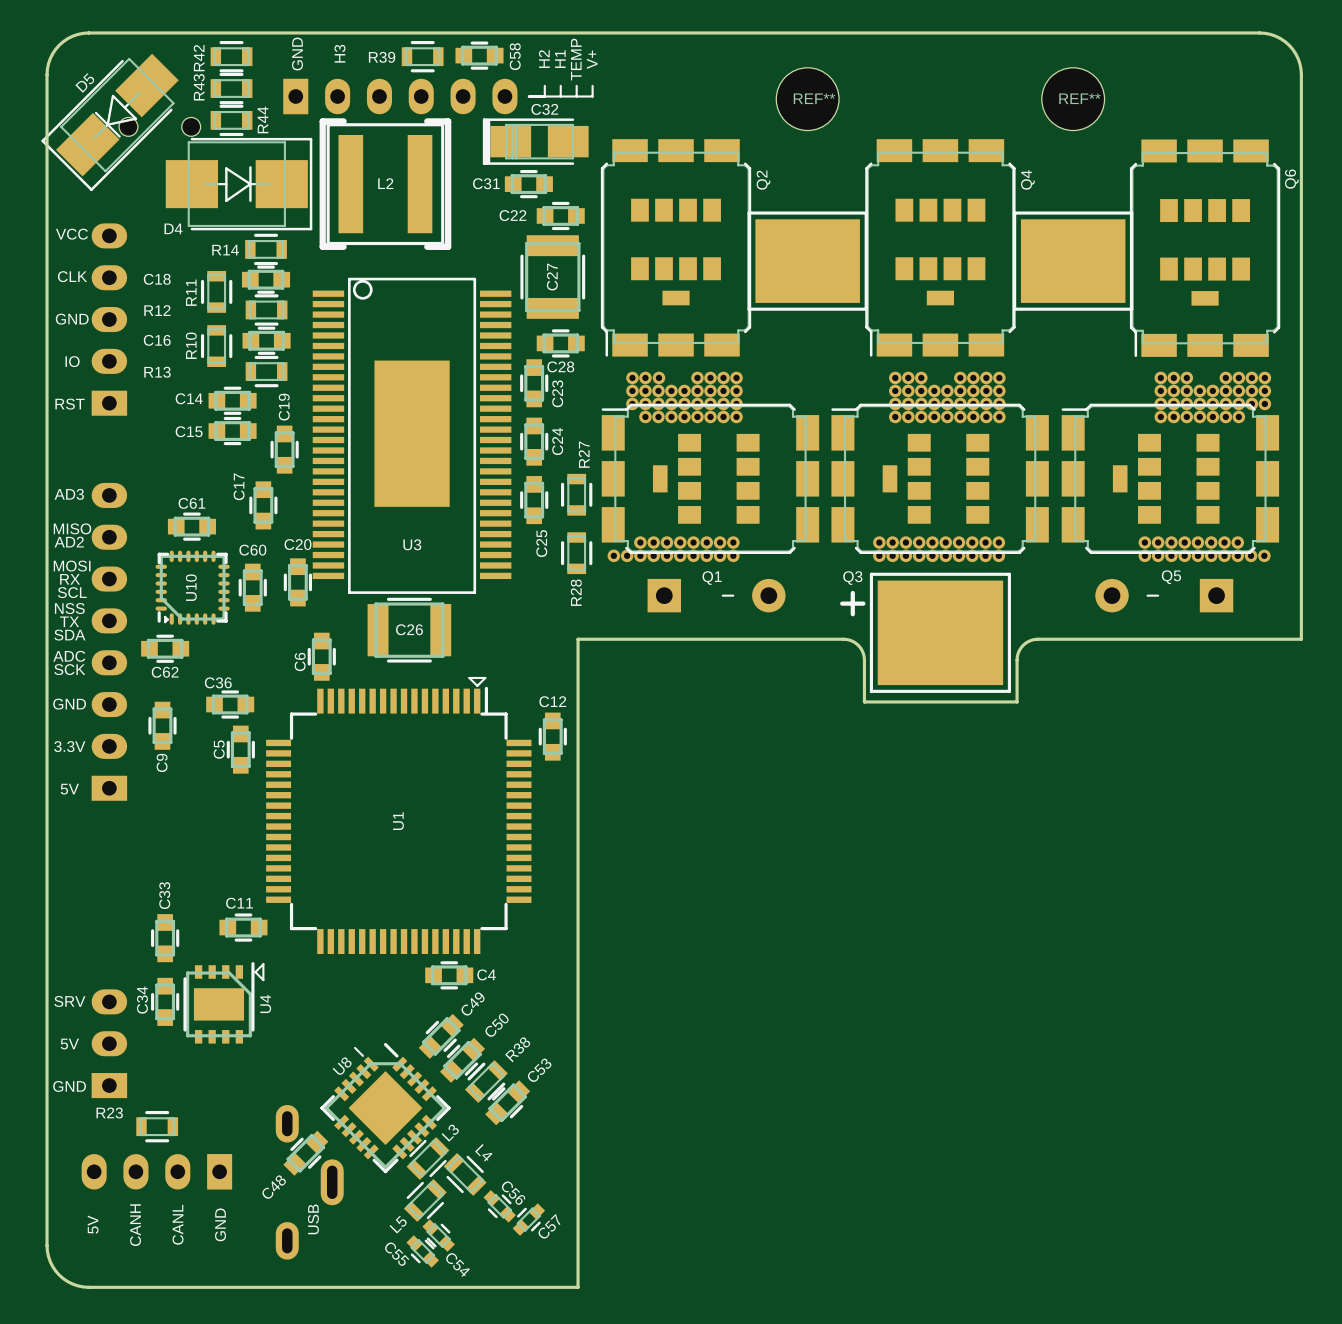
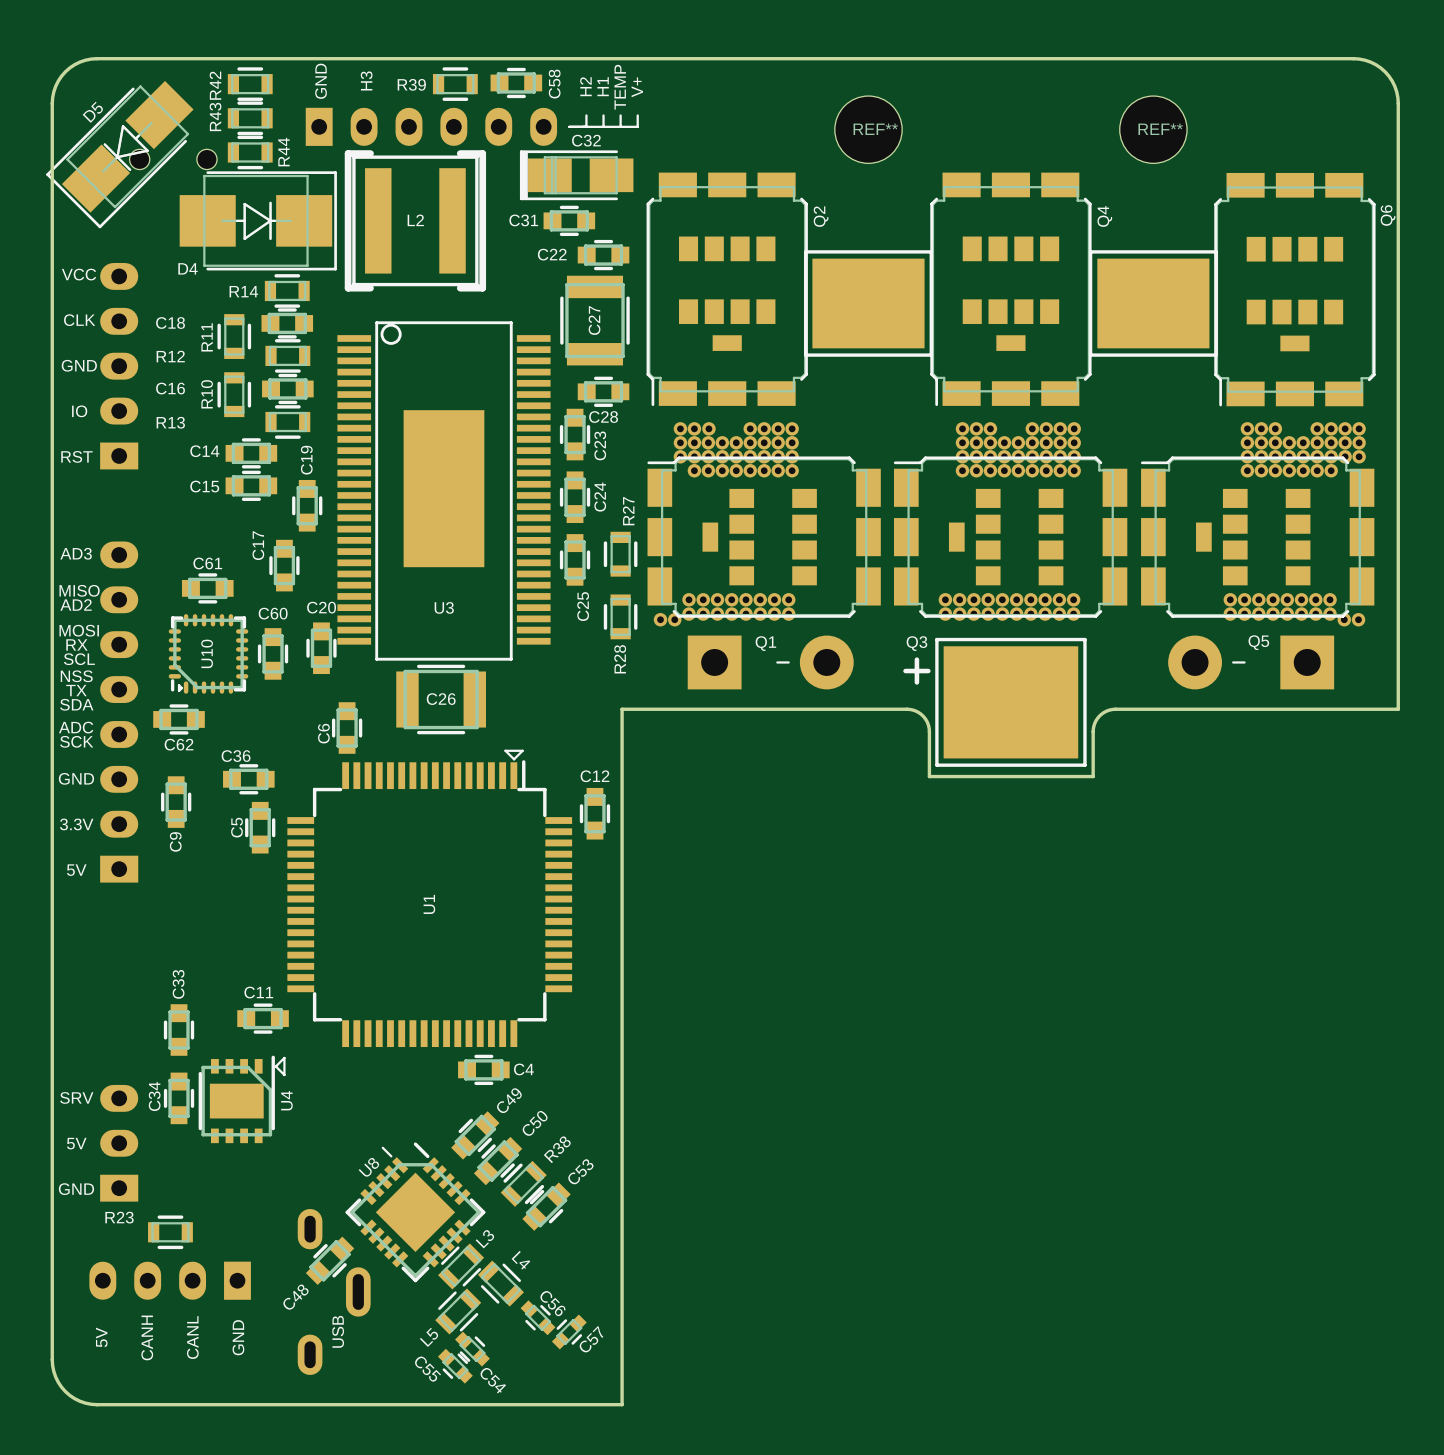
part: none -> (689, 599)
part: none -> (703, 599)
part: none -> (717, 599)
part: none -> (731, 599)
part: none -> (745, 599)
part: none -> (760, 599)
part: none -> (774, 599)
part: none -> (788, 599)
part: none -> (945, 599)
part: none -> (959, 599)
part: none -> (973, 599)
part: none -> (988, 599)
part: none -> (1002, 599)
part: none -> (1016, 599)
part: none -> (1030, 599)
part: none -> (1045, 599)
part: none -> (1059, 599)
part: none -> (1073, 599)
part: none -> (1230, 599)
part: none -> (1244, 599)
part: none -> (1258, 599)
part: none -> (1273, 599)
part: none -> (1287, 599)
part: none -> (1301, 599)
part: none -> (1315, 599)
part: none -> (1330, 599)
part: (640, 542) -> none
part: (653, 542) -> none
part: (666, 542) -> none
part: (680, 542) -> none
part: (693, 542) -> none
part: (706, 542) -> none
part: (720, 542) -> none
part: (733, 542) -> none
part: (879, 542) -> none
part: (892, 542) -> none
part: (905, 542) -> none
part: (919, 542) -> none
part: (932, 542) -> none
part: (945, 542) -> none
part: (959, 542) -> none
part: (972, 542) -> none
part: (985, 542) -> none
part: (998, 542) -> none
part: (1144, 542) -> none
part: (1158, 542) -> none
part: (1171, 542) -> none
part: (1184, 542) -> none
part: (1197, 542) -> none
part: (1211, 542) -> none
part: (1224, 542) -> none
part: (1237, 542) -> none
part: none -> (689, 614)
part: none -> (703, 614)
part: none -> (717, 614)
part: none -> (731, 614)
part: none -> (745, 614)
part: none -> (760, 614)
part: none -> (774, 614)
part: none -> (788, 614)
part: none -> (945, 614)
part: none -> (959, 614)
part: none -> (973, 614)
part: none -> (988, 614)
part: none -> (1002, 614)
part: none -> (1016, 614)
part: none -> (1030, 614)
part: none -> (1045, 614)
part: none -> (1059, 614)
part: none -> (1073, 614)
part: none -> (1230, 614)
part: none -> (1244, 614)
part: none -> (1258, 614)
part: none -> (1273, 614)
part: none -> (1287, 614)
part: none -> (1301, 614)
part: none -> (1315, 614)
part: none -> (1330, 614)
part: (640, 555) -> none
part: (653, 555) -> none
part: (666, 555) -> none
part: (680, 555) -> none
part: (693, 555) -> none
part: (706, 555) -> none
part: (720, 555) -> none
part: (733, 555) -> none
part: (879, 555) -> none
part: (892, 555) -> none
part: (905, 555) -> none
part: (919, 555) -> none
part: (932, 555) -> none
part: (945, 555) -> none
part: (959, 555) -> none
part: (972, 555) -> none
part: (985, 555) -> none
part: (998, 555) -> none
part: (1144, 555) -> none
part: (1158, 555) -> none
part: (1171, 555) -> none
part: (1184, 555) -> none
part: (1197, 555) -> none
part: (1211, 555) -> none
part: (1224, 555) -> none
part: (1237, 555) -> none
part footprint: [647, 578, 786, 613] -> [687, 635, 854, 690]
part footprint: [1095, 578, 1234, 613] -> [1168, 635, 1335, 690]

